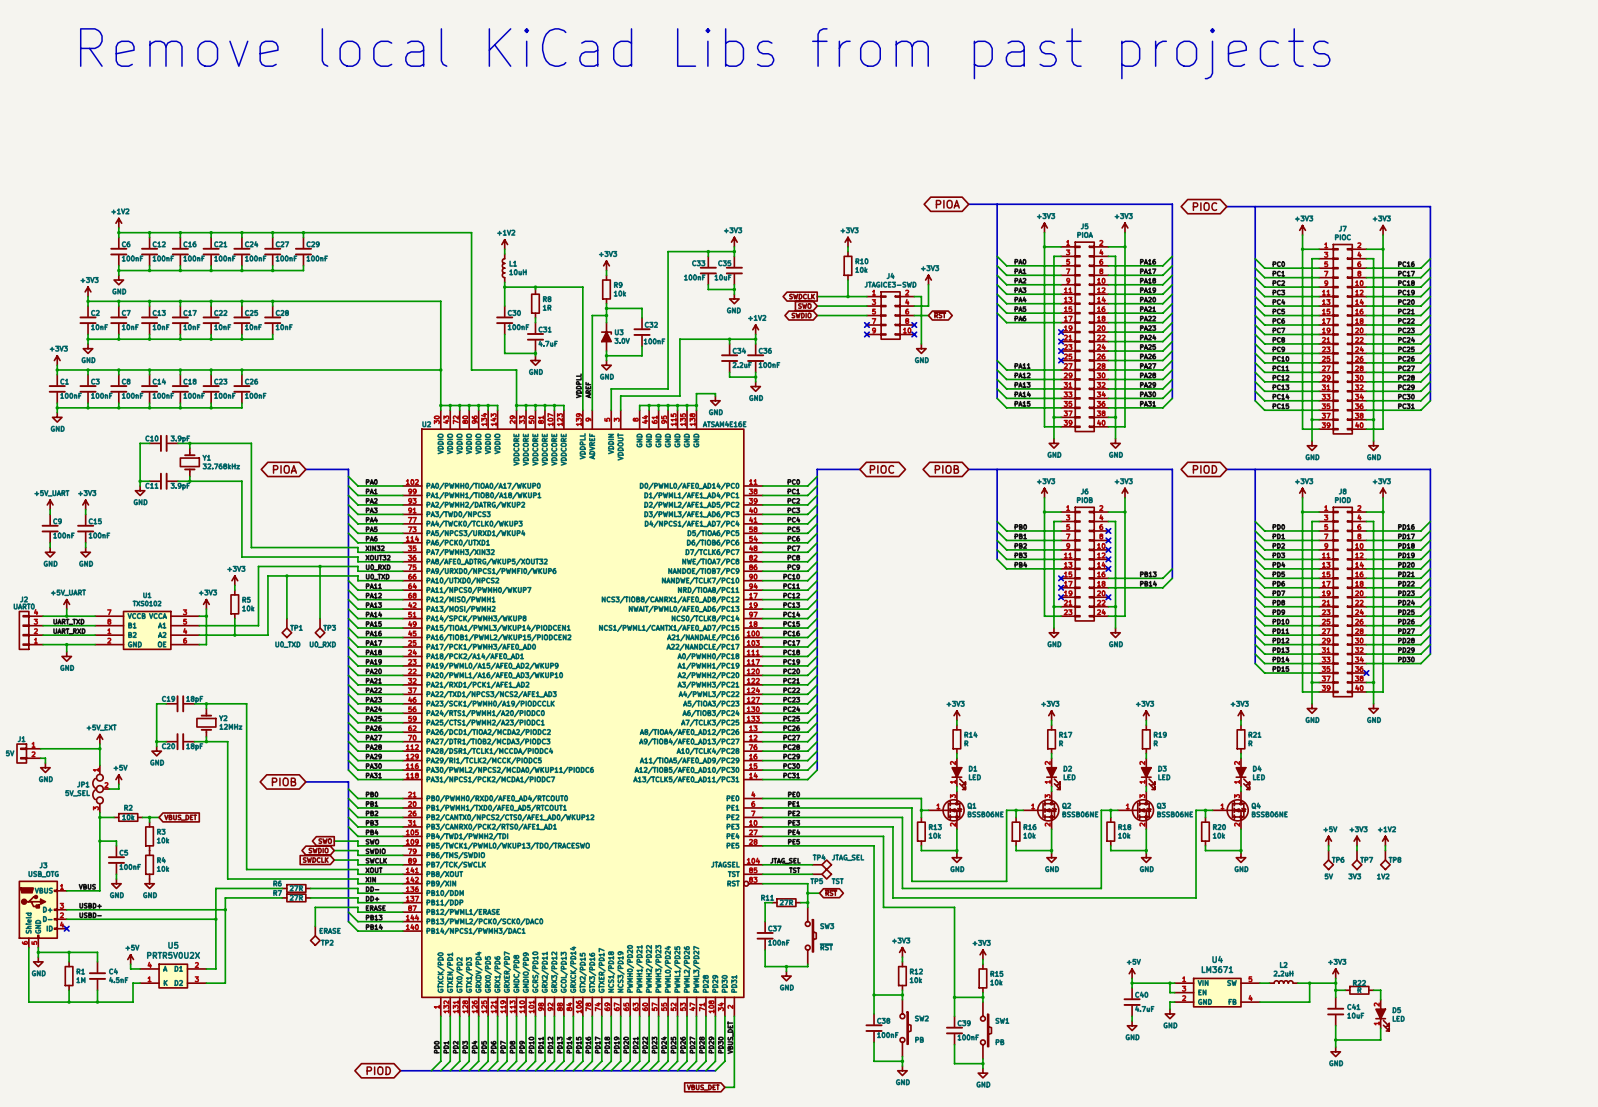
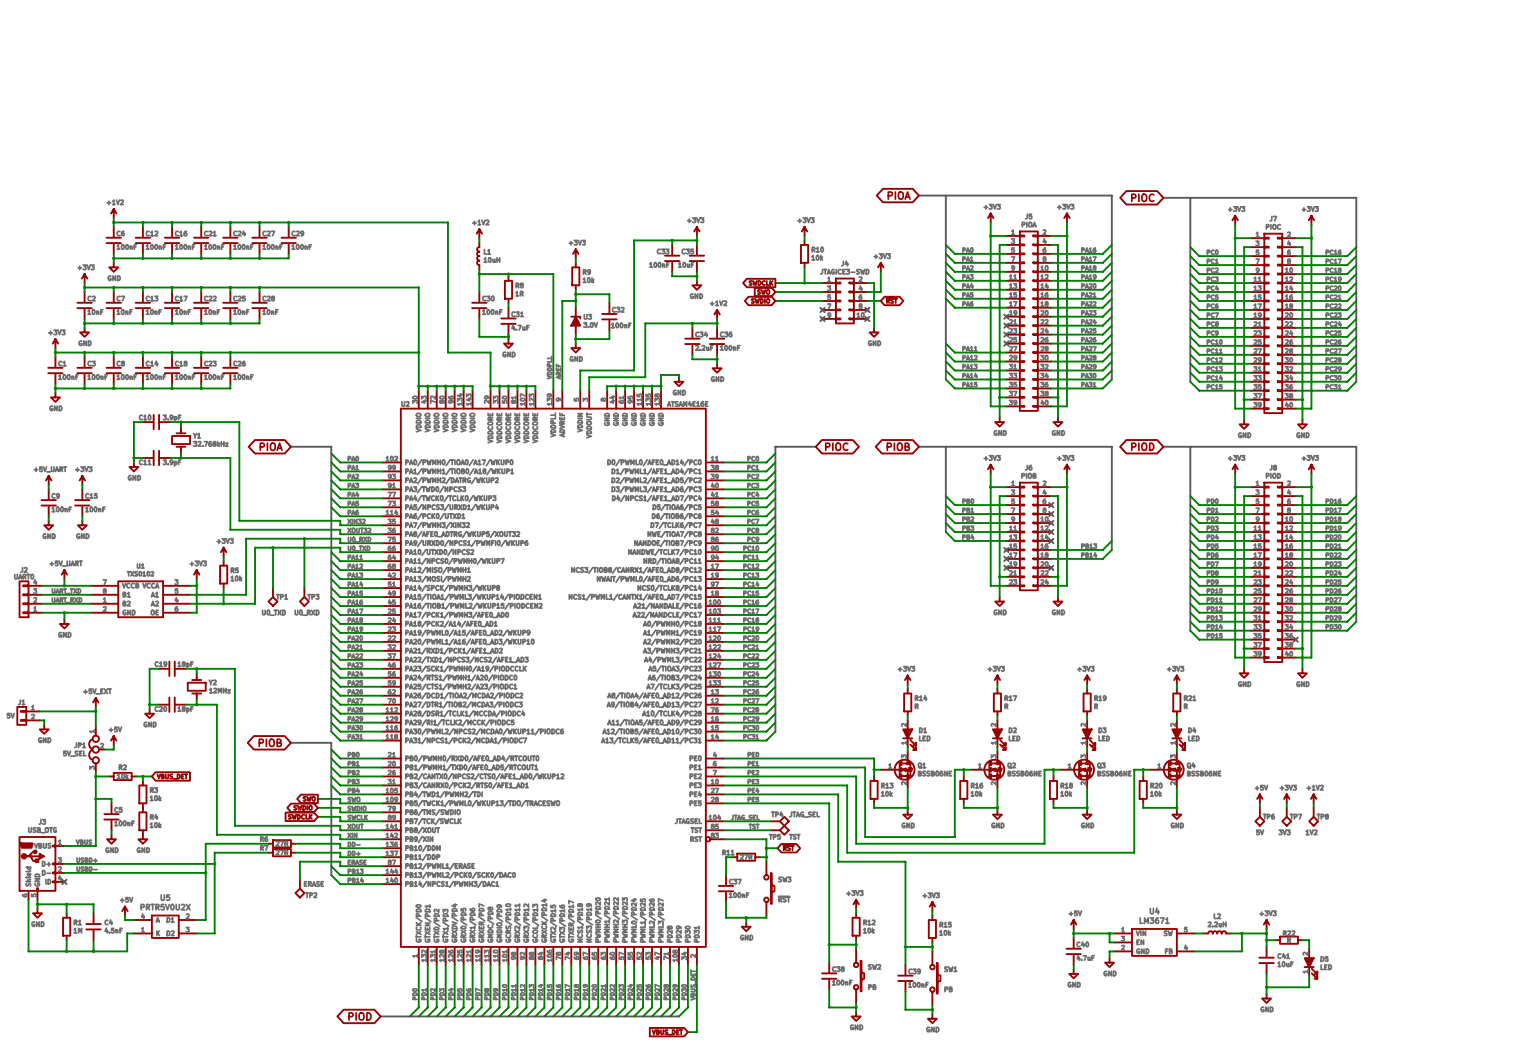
text: Remove local KiCad Libs from past projects (705, 53) -> none

